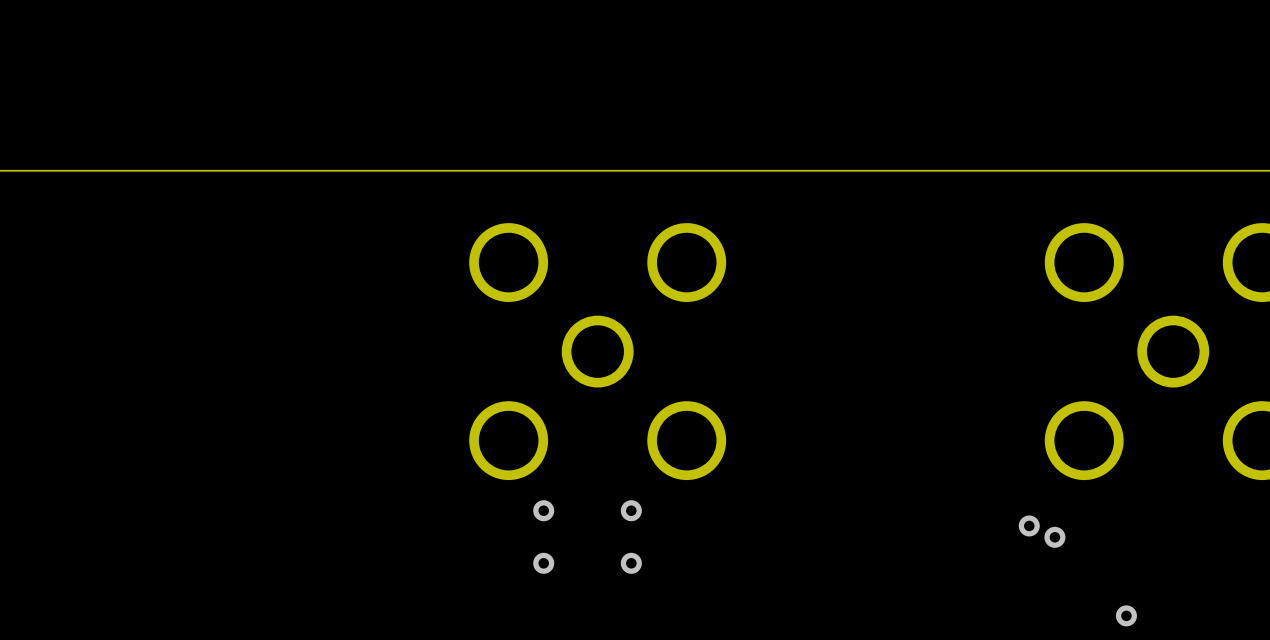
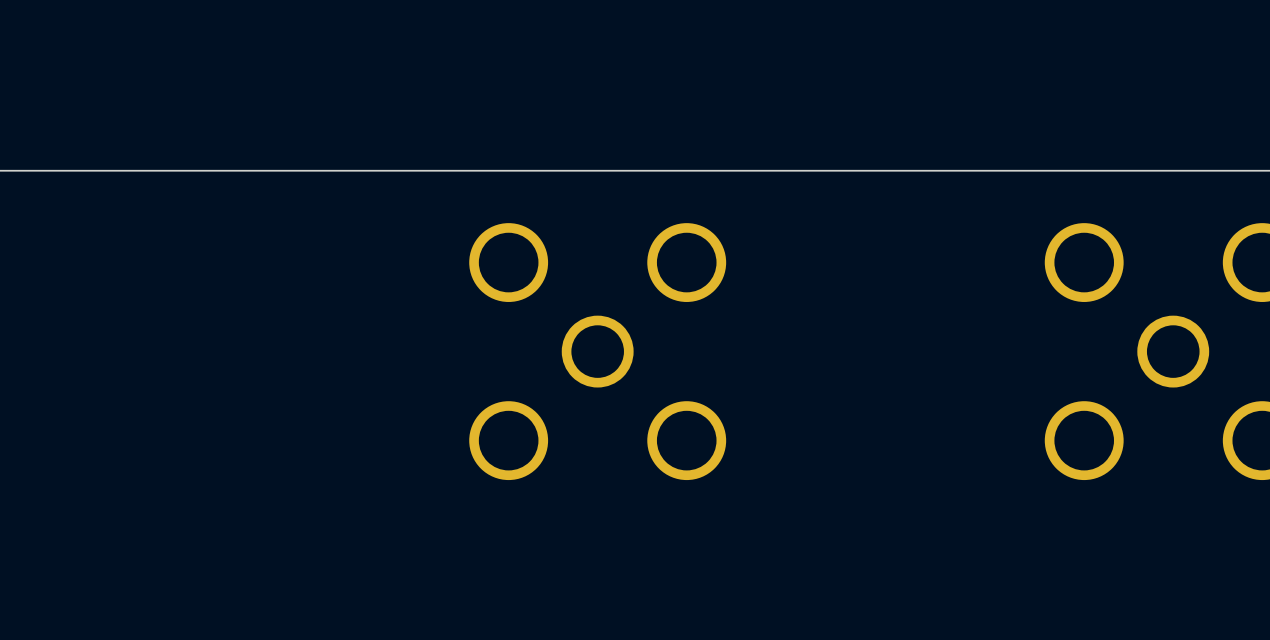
via: (543, 510) -> none
via: (631, 510) -> none
via: (1029, 525) -> none
via: (1054, 537) -> none
via: (543, 563) -> none
via: (631, 563) -> none
via: (1126, 615) -> none

